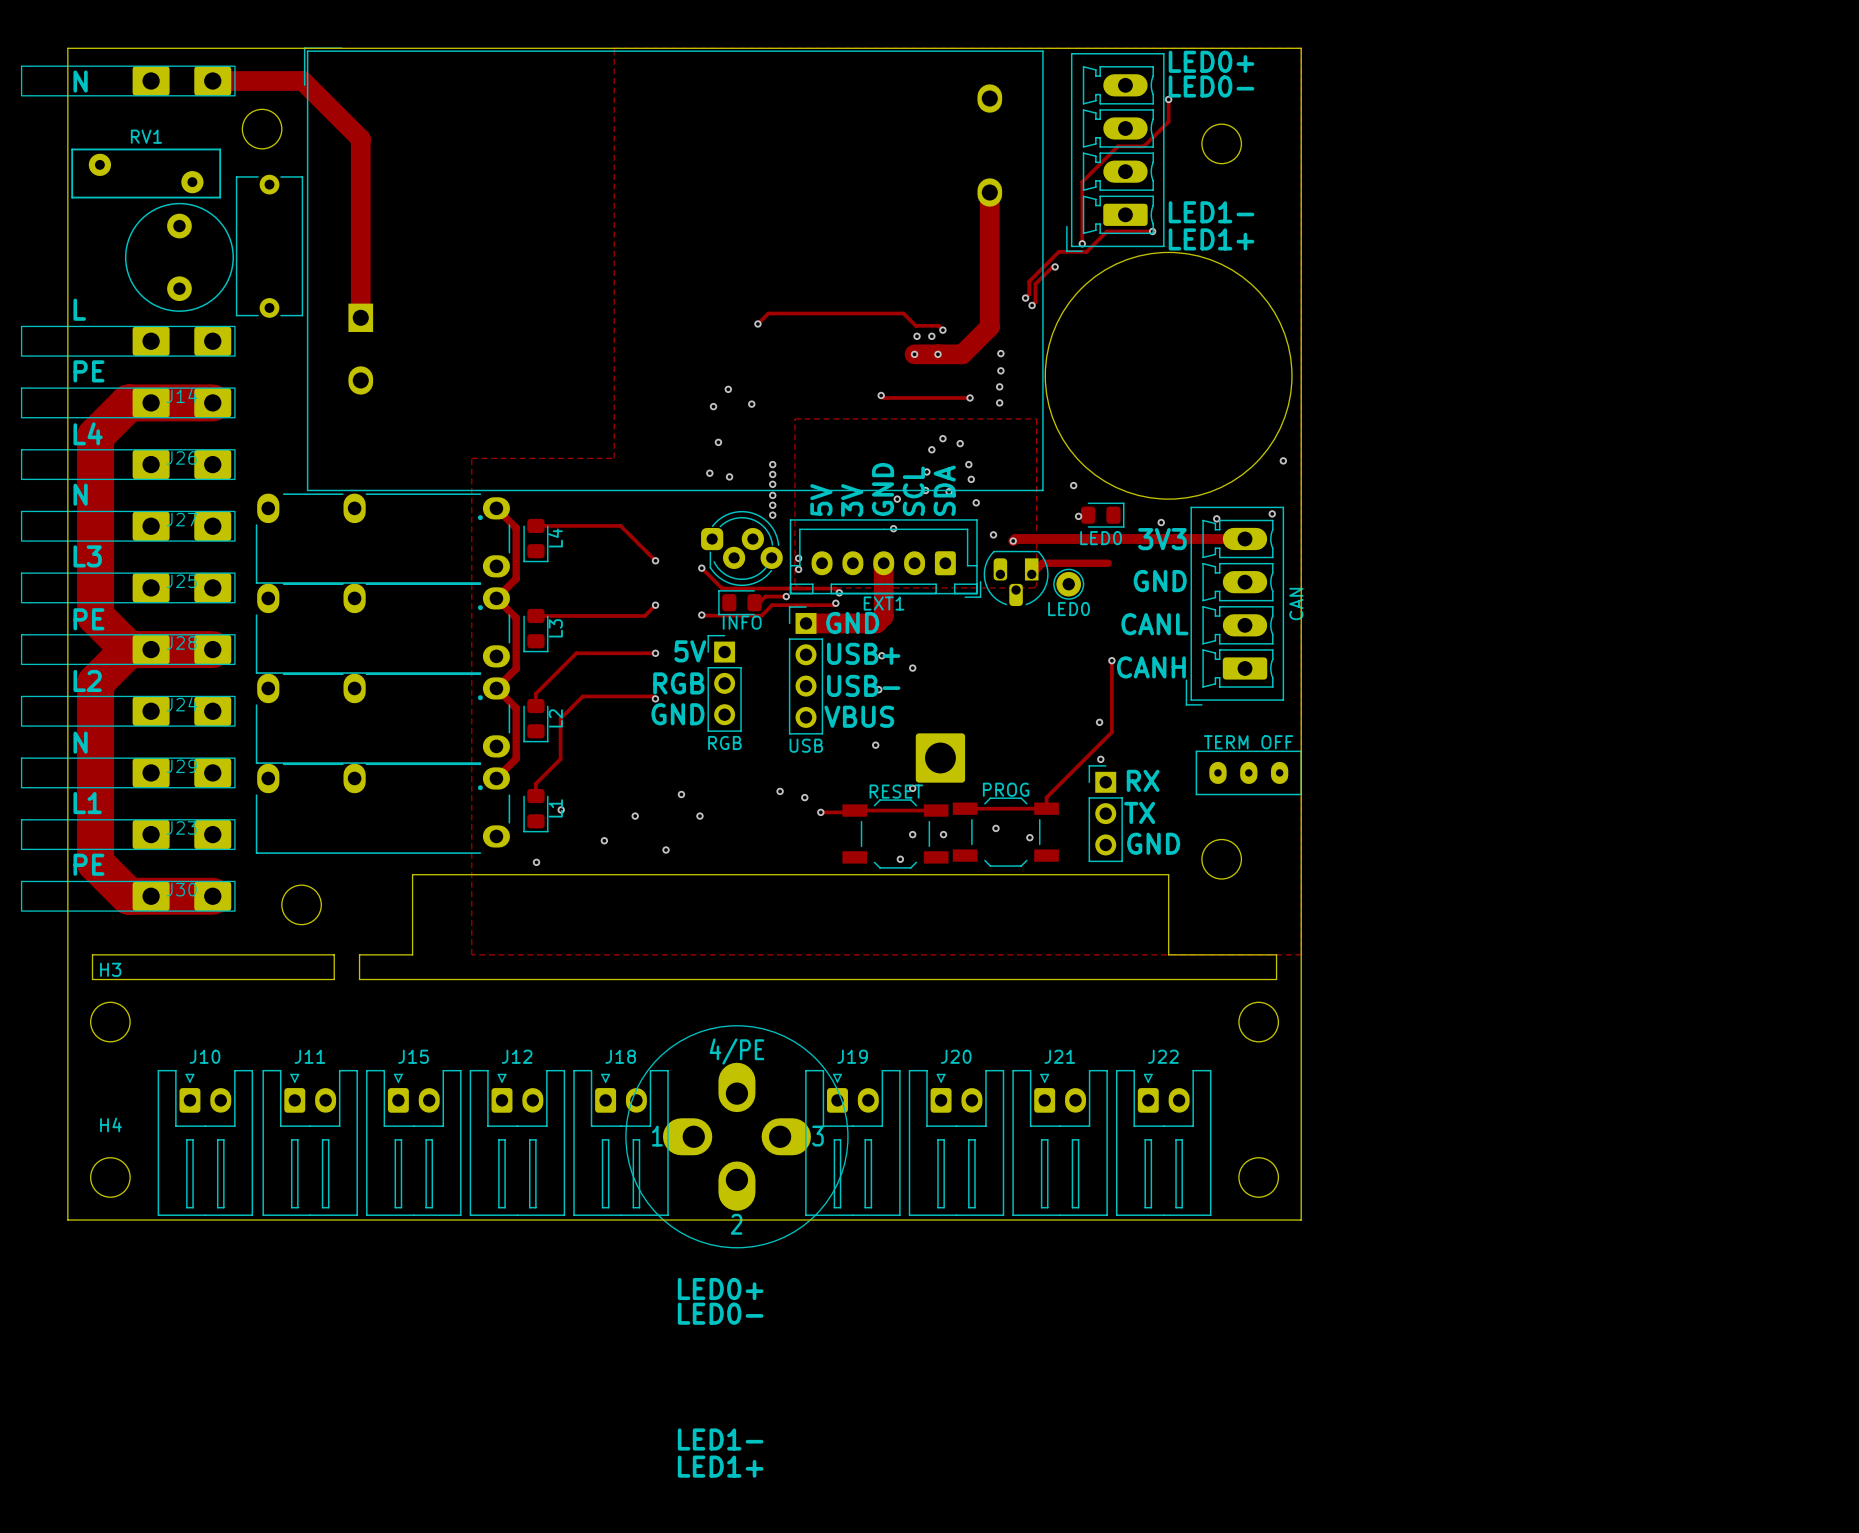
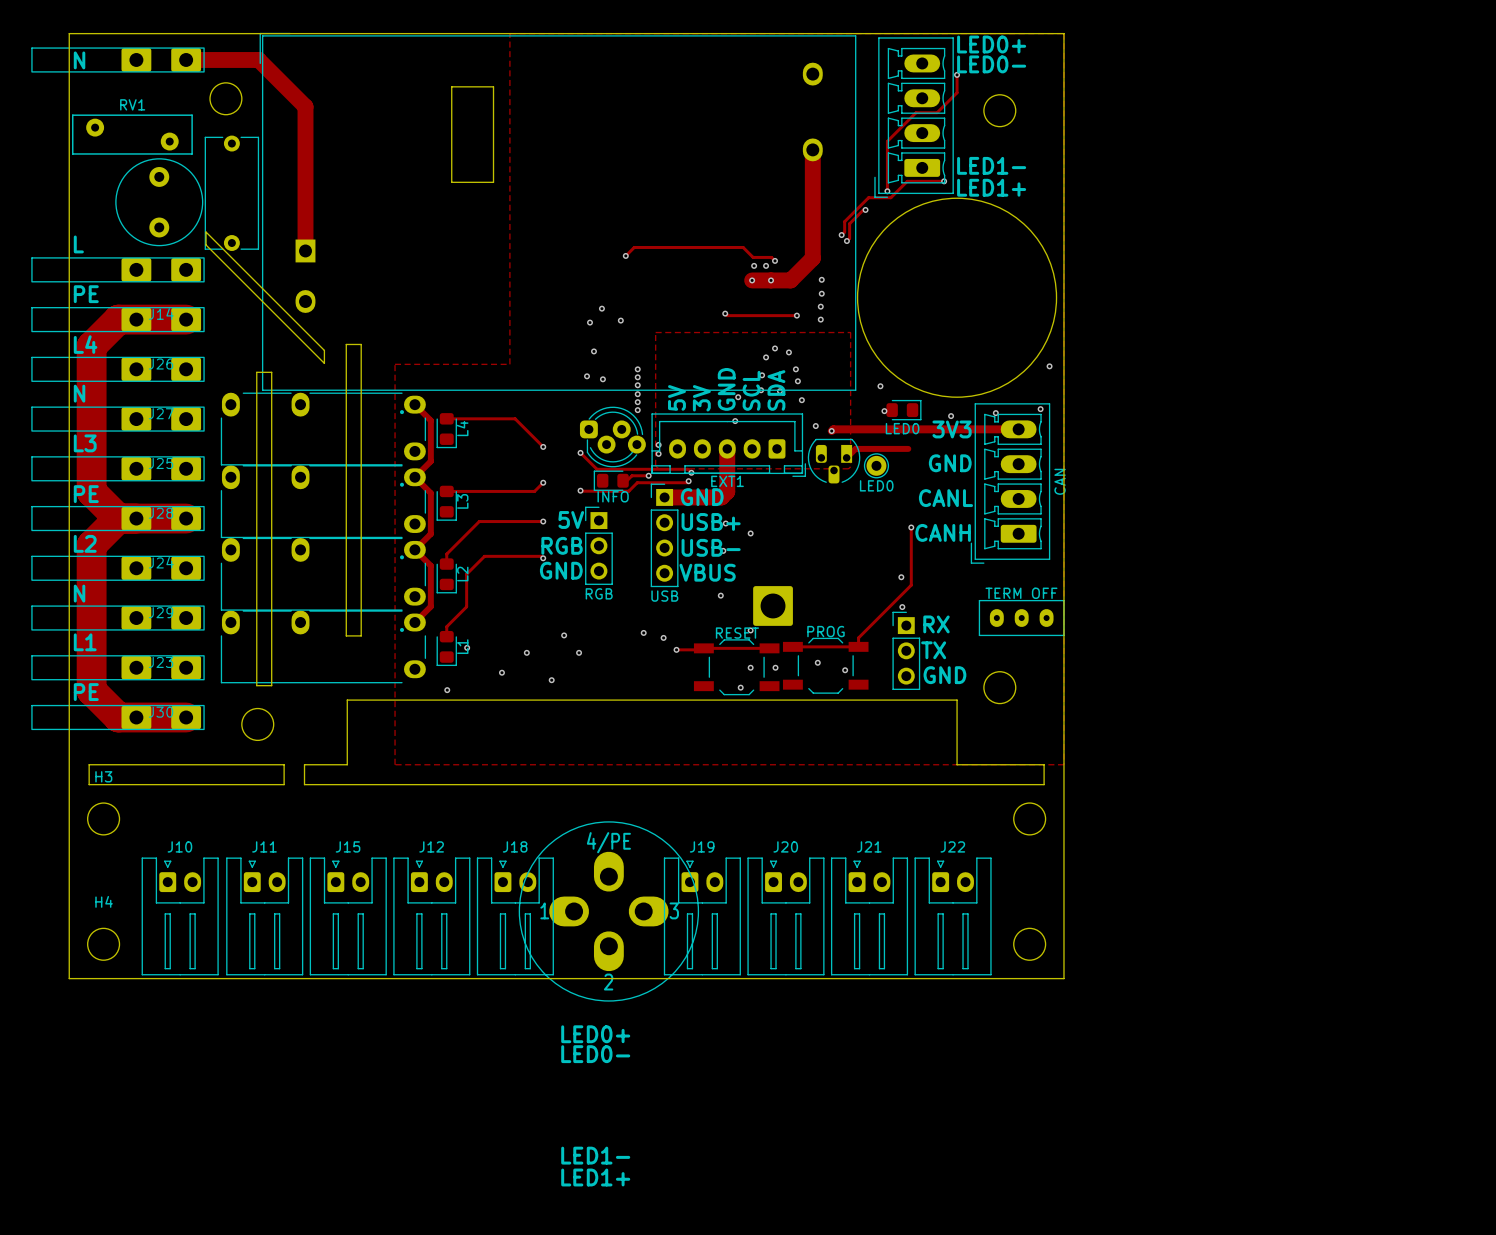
board edge: none -> (451, 86) (493, 86) (493, 182) (451, 182) (451, 86)
board edge: none -> (206, 232) (324, 350) (324, 363) (206, 245) (206, 232)
board edge: none -> (346, 344) (361, 344) (361, 635) (346, 635) (346, 344)
board edge: none -> (256, 372) (271, 372) (271, 685) (256, 685) (256, 372)

